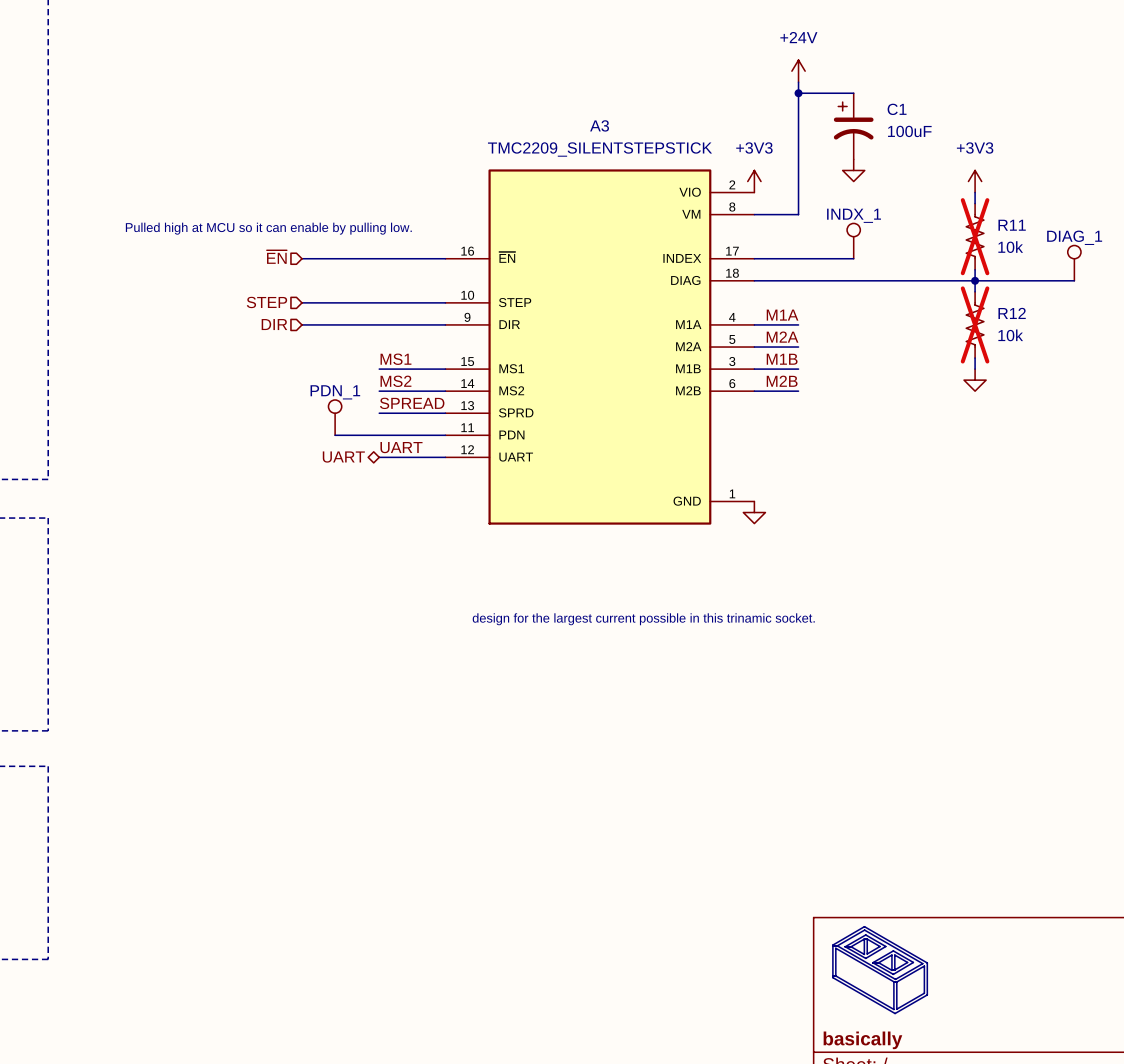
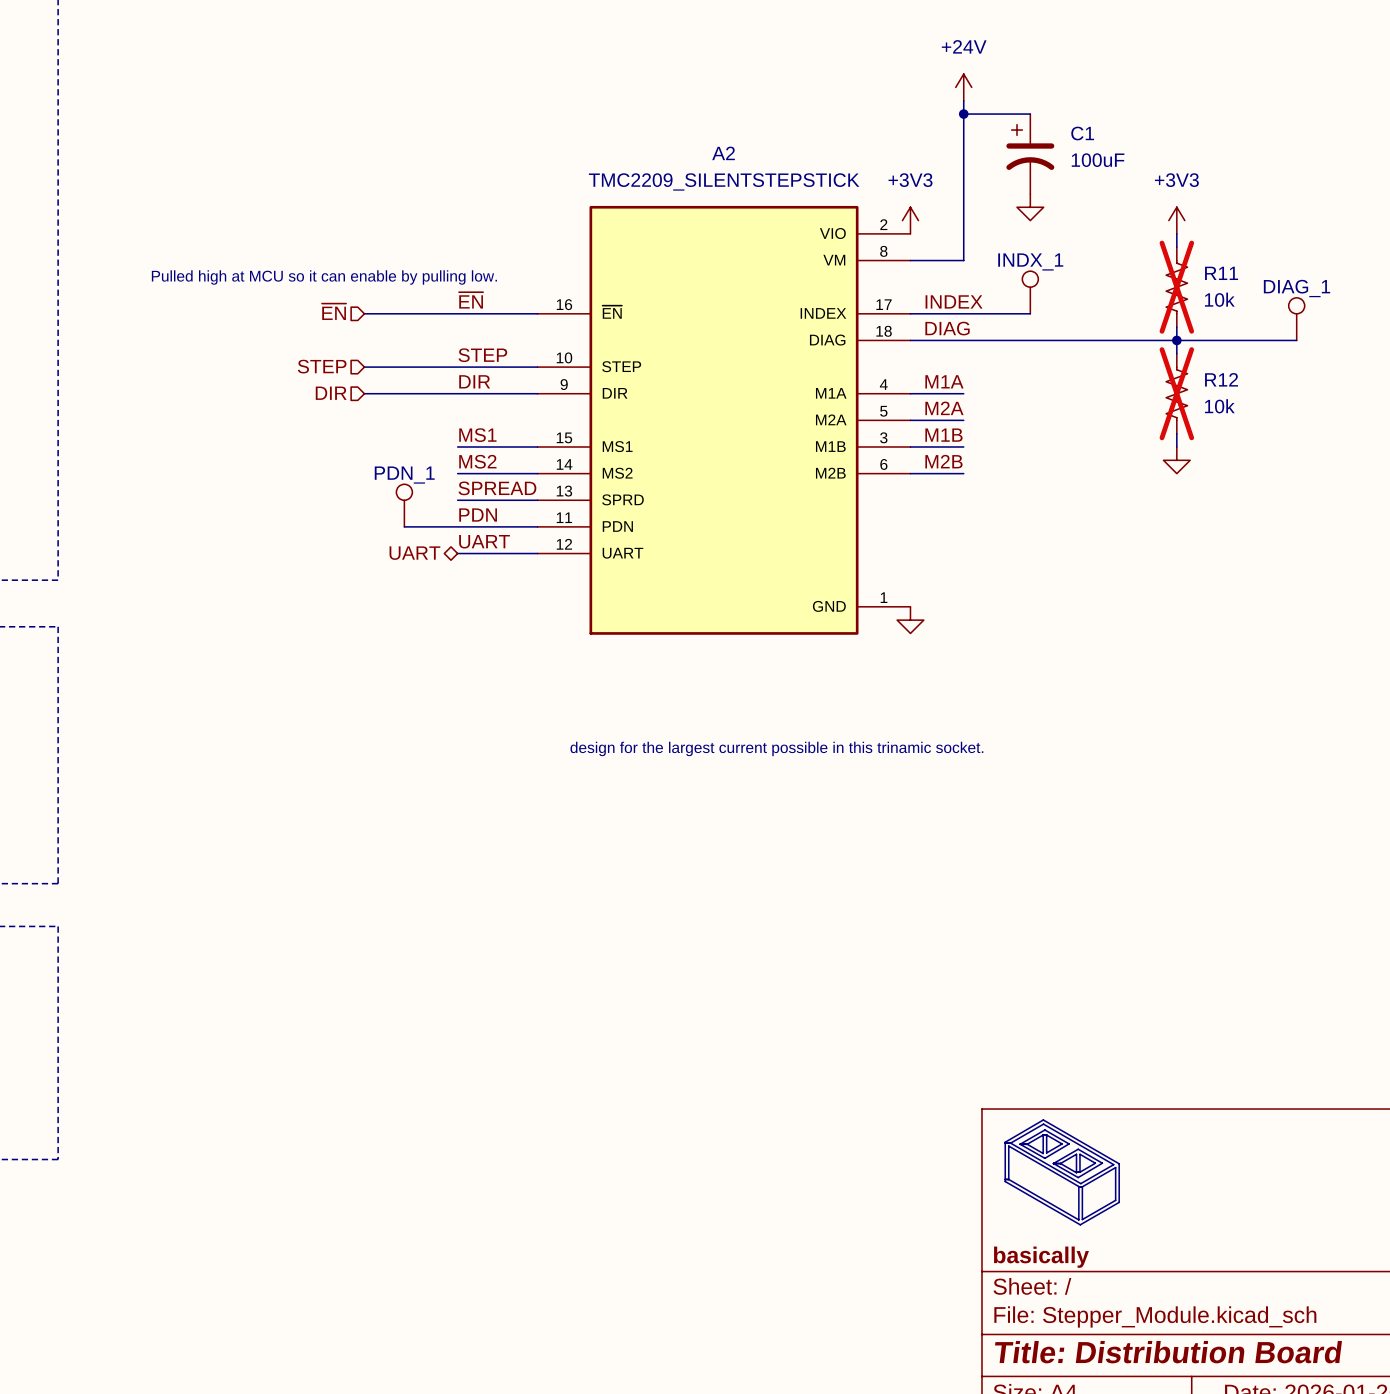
A3 name: A3 (599, 125) -> A2 (723, 153)
label: none -> ~{EN} (471, 300)
label: none -> INDEX (954, 301)
label: none -> DIAG (947, 328)
label: none -> STEP (482, 355)
label: none -> DIR (474, 381)
label: none -> PDN (478, 515)

